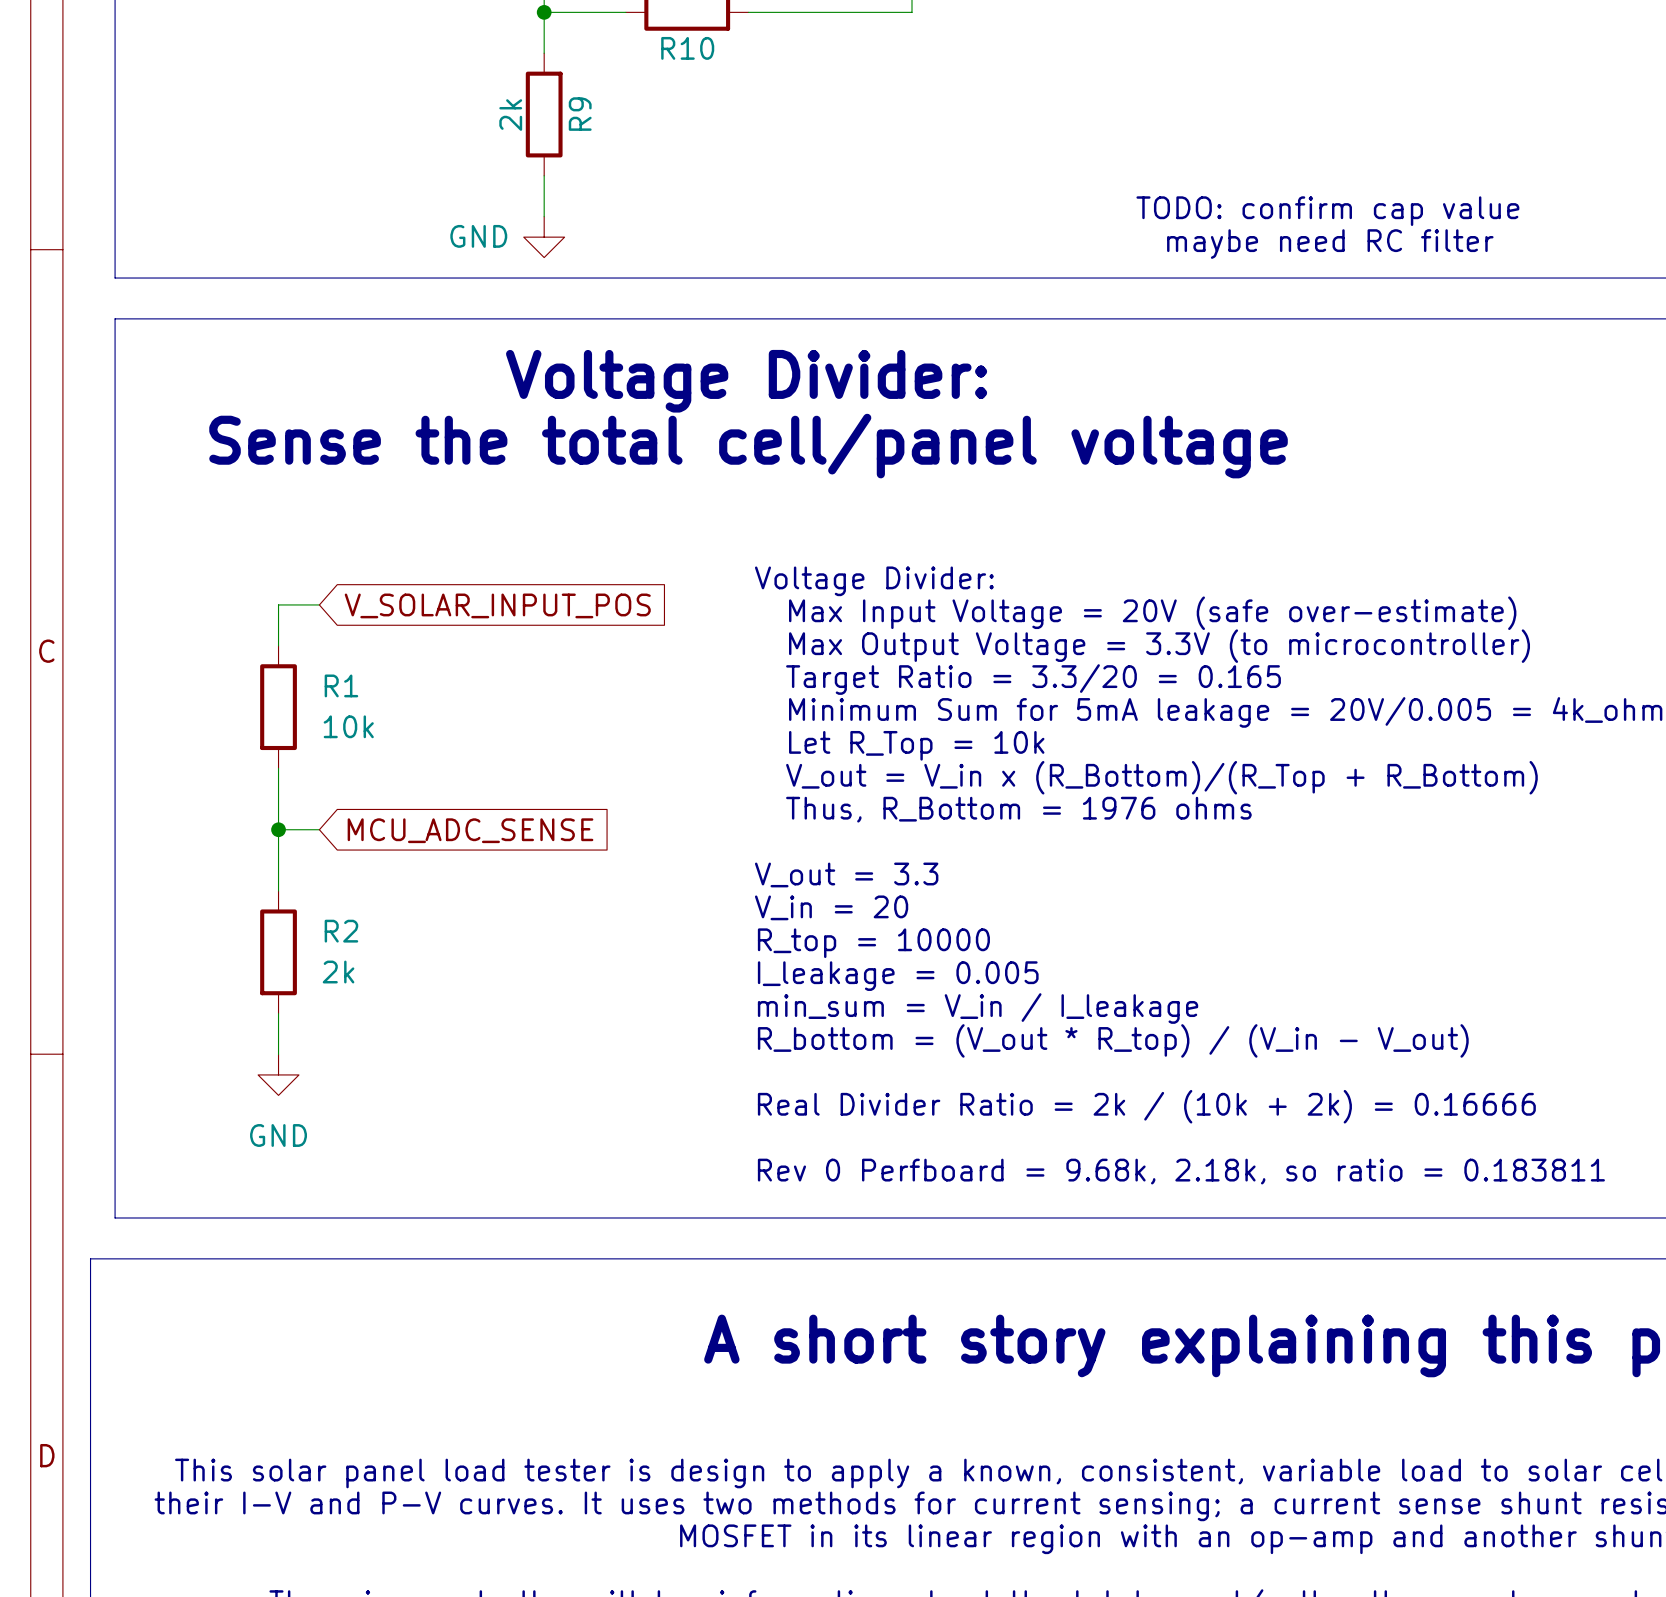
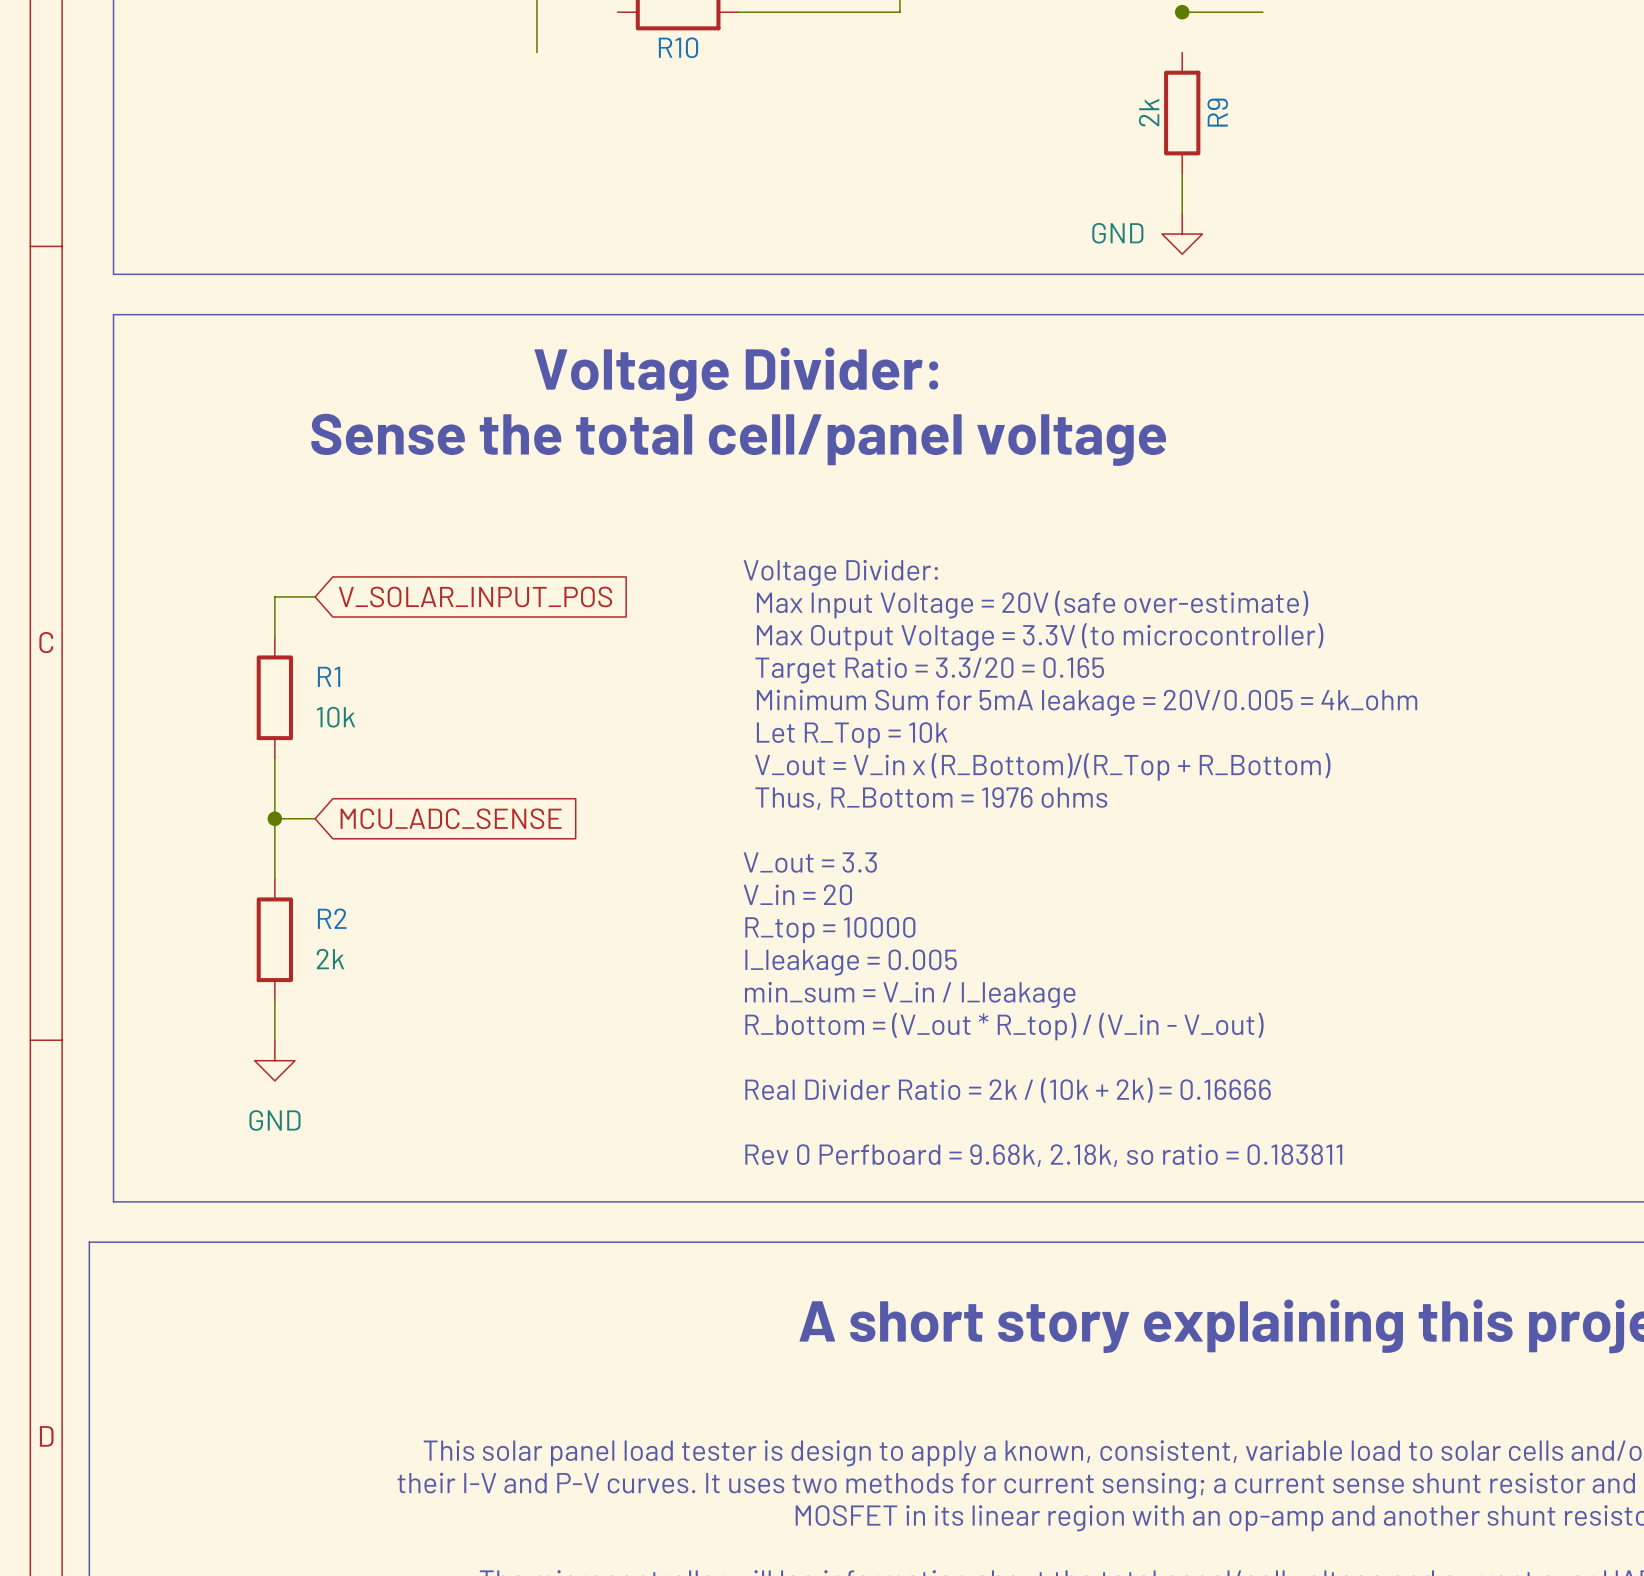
wire: (544, 12) (625, 12) -> none
junction: (544, 12) -> none
wire: none -> (1182, 12) (1262, 12)
junction: none -> (1182, 12)
R9 position: (544, 114) -> (1182, 113)
wire: (544, 175) (544, 216) -> none
wire: none -> (1182, 173) (1182, 213)
text: TODO: confirm cap value (1327, 211) -> none
power symbol: GND (544, 237) -> none
power symbol: none -> GND (1182, 234)
text: maybe need RC filter (1330, 244) -> none

